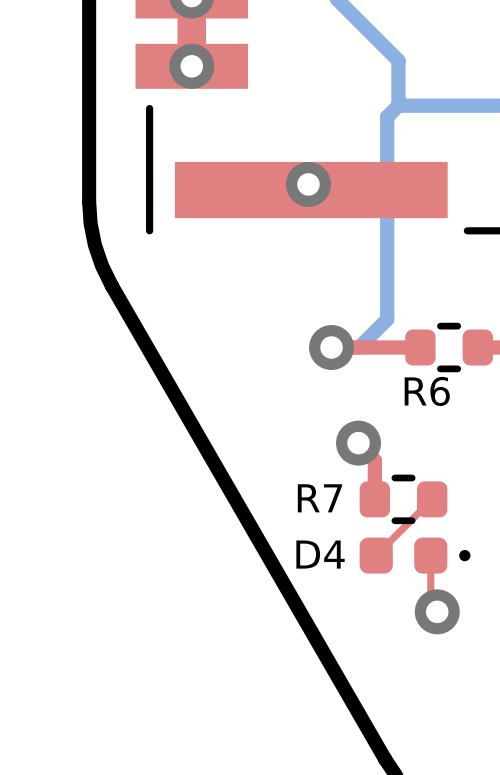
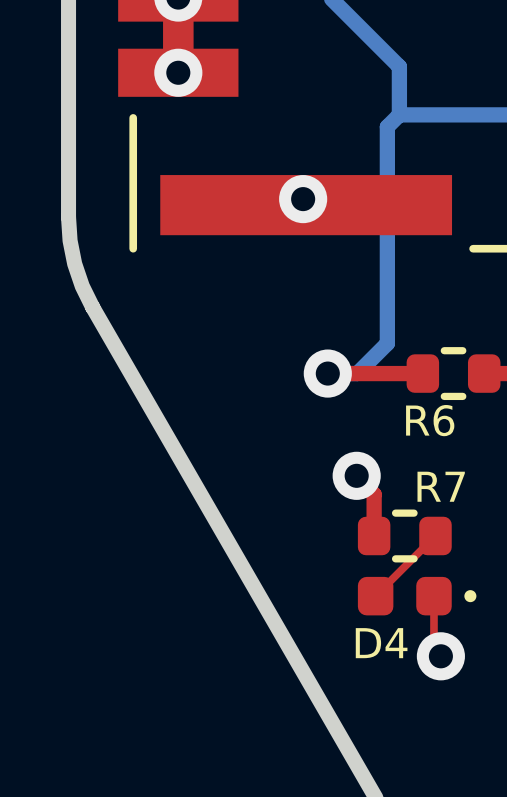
R7 name position: R7 (319, 498) -> R7 (441, 486)
D4 name position: D4 (320, 554) -> D4 (381, 643)

